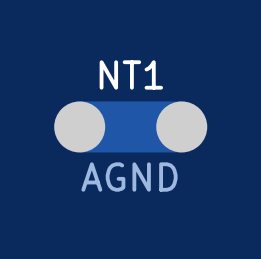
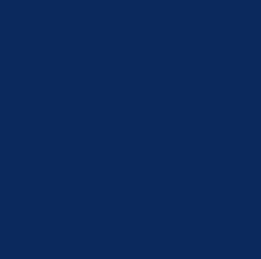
NT1: AGND (130, 126) -> none

